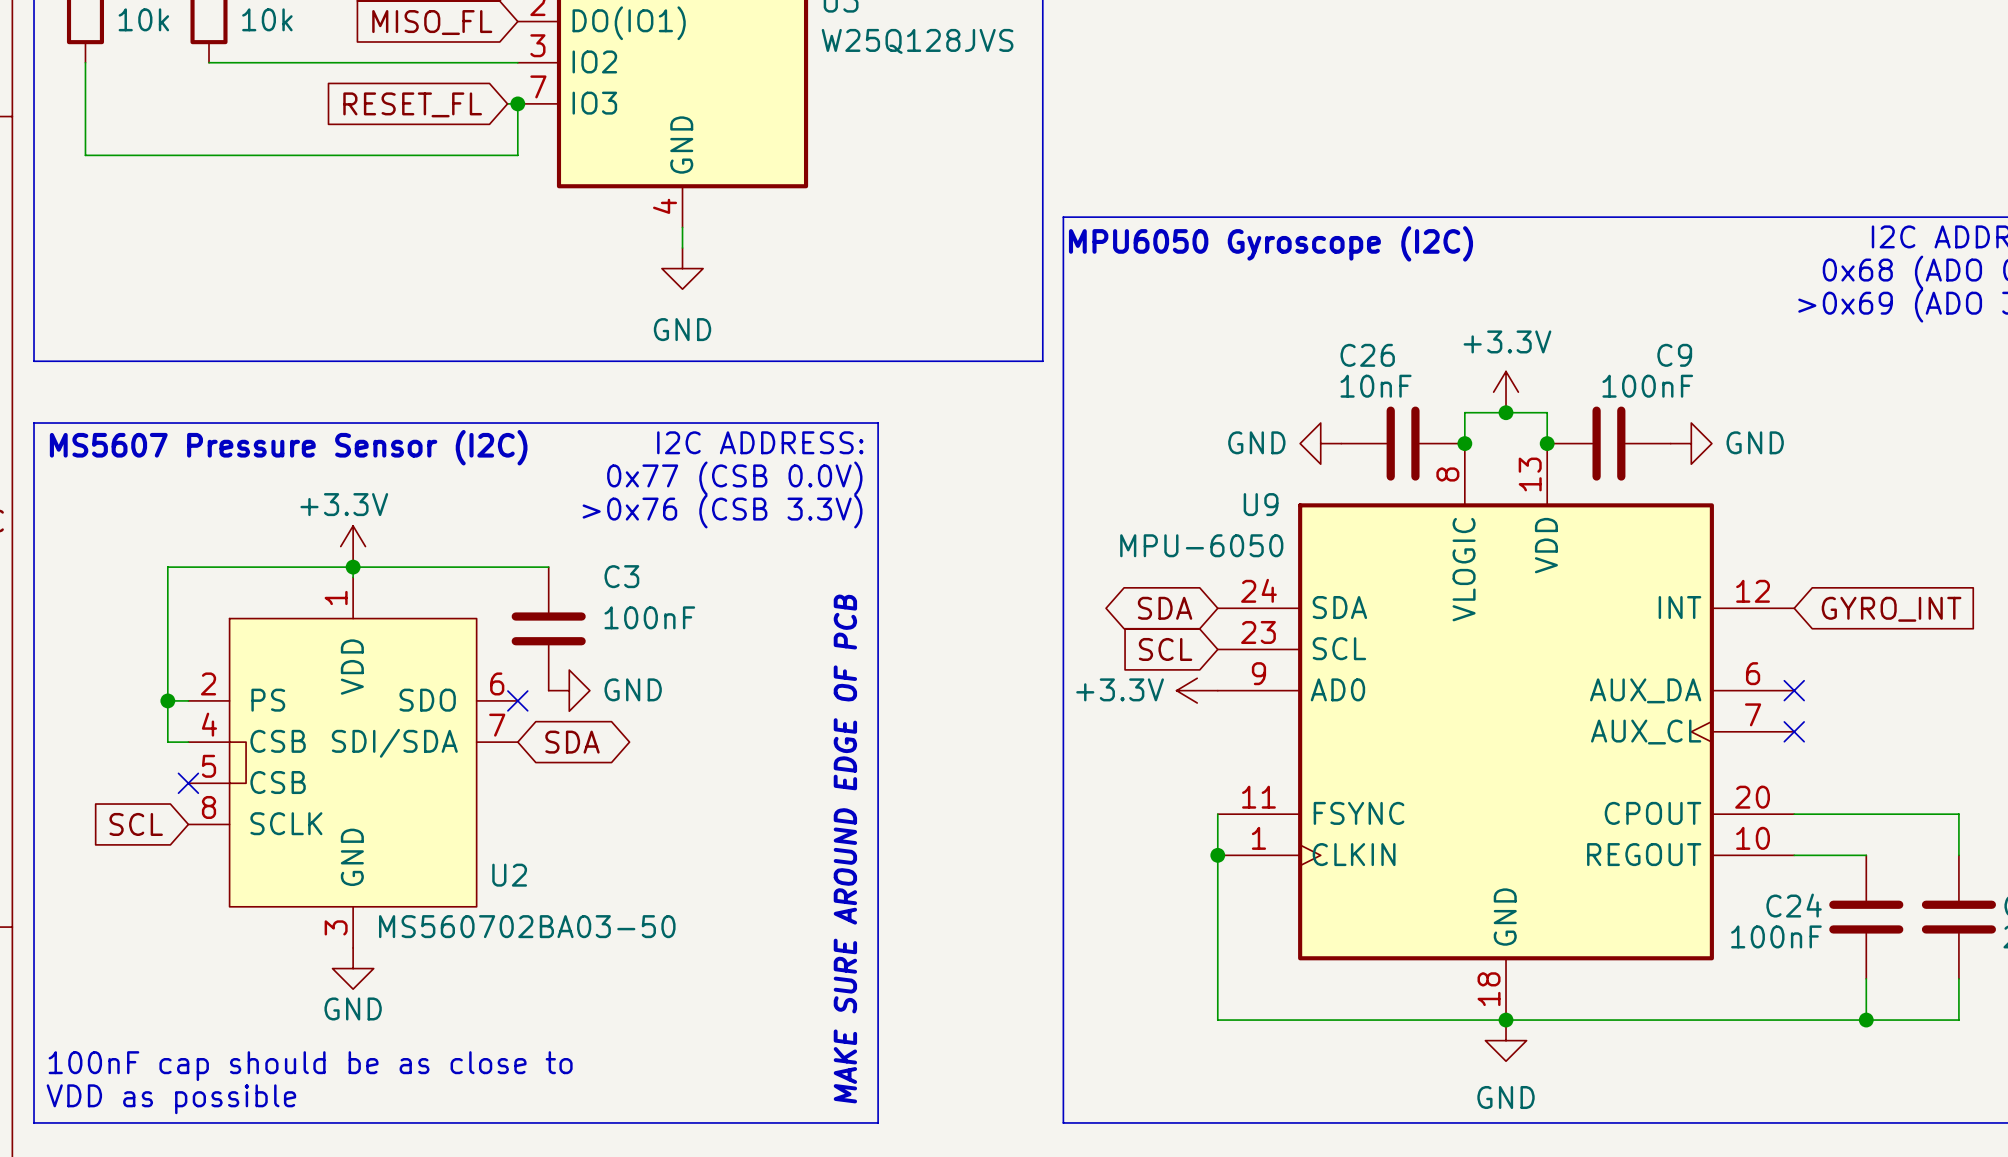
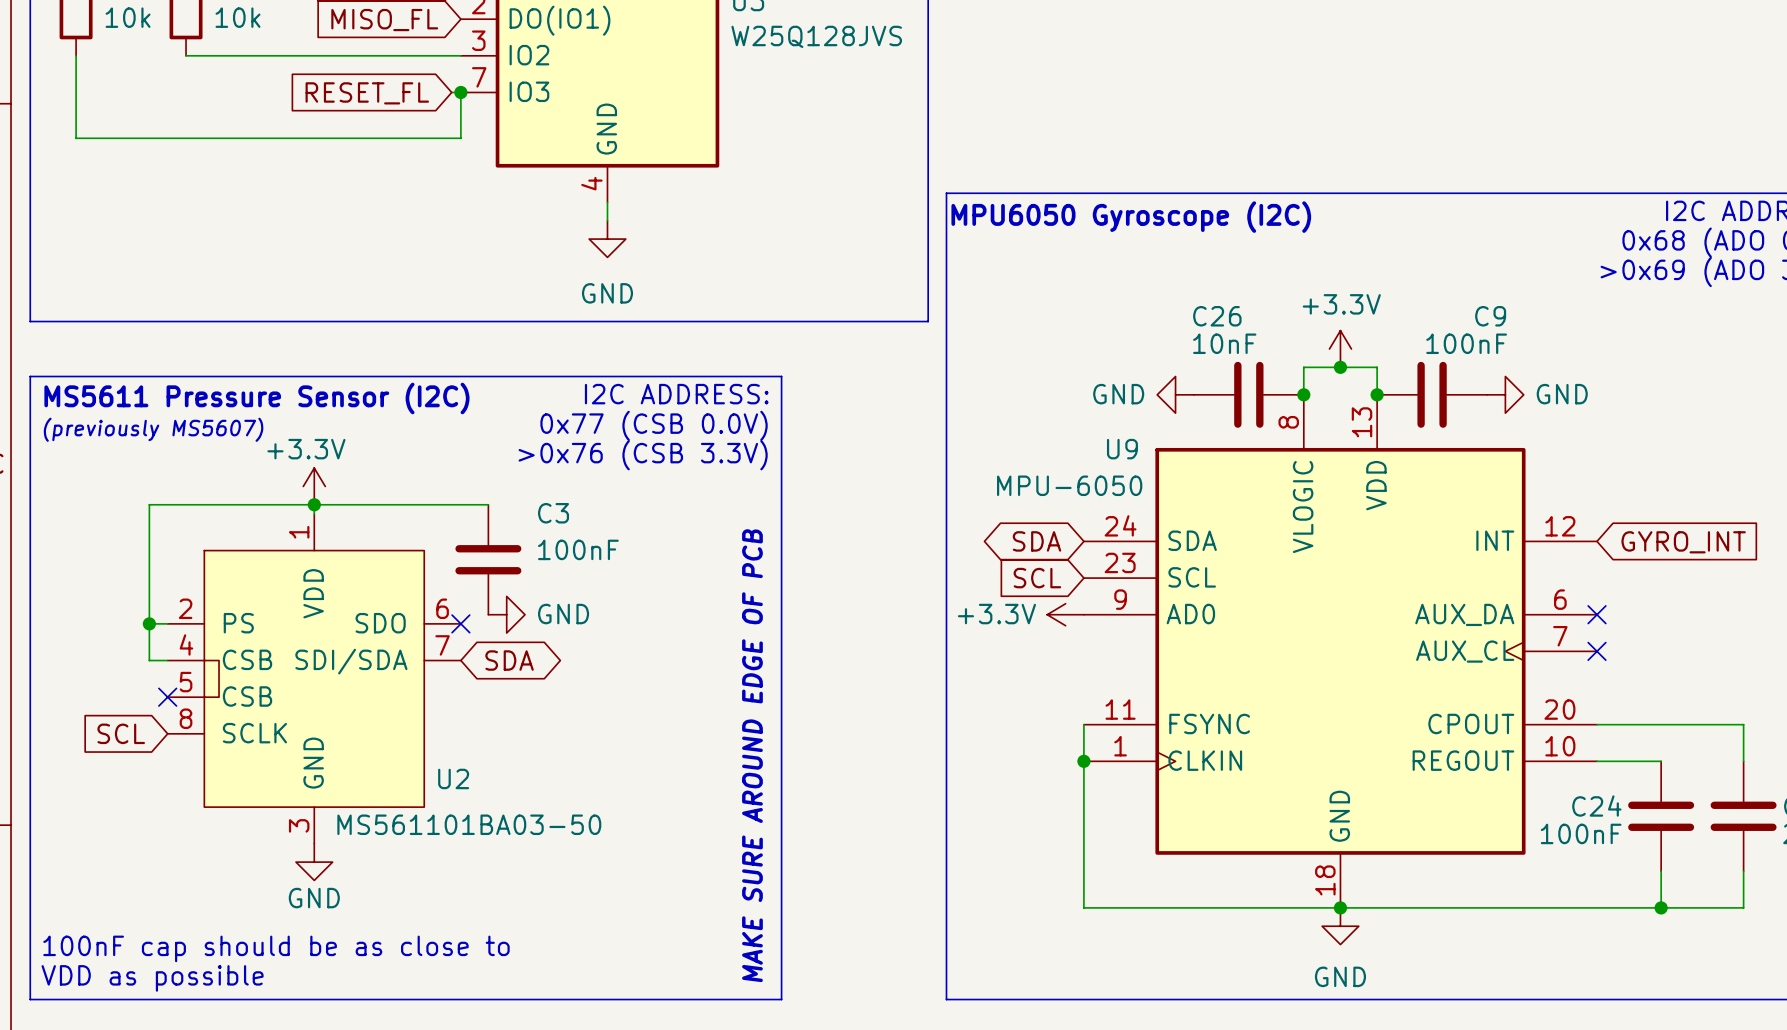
text: MS5607 Pressure Sensor (I2C) (288, 447) -> MS5611 Pressure Sensor (I2C) (256, 398)
text: none -> (previously MS5607) (153, 429)
U2 value: MS560702BA03-50 (527, 926) -> MS561101BA03-50 (469, 824)

